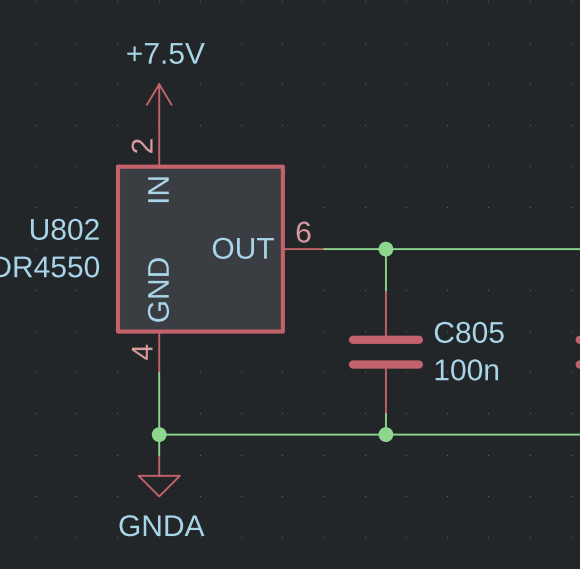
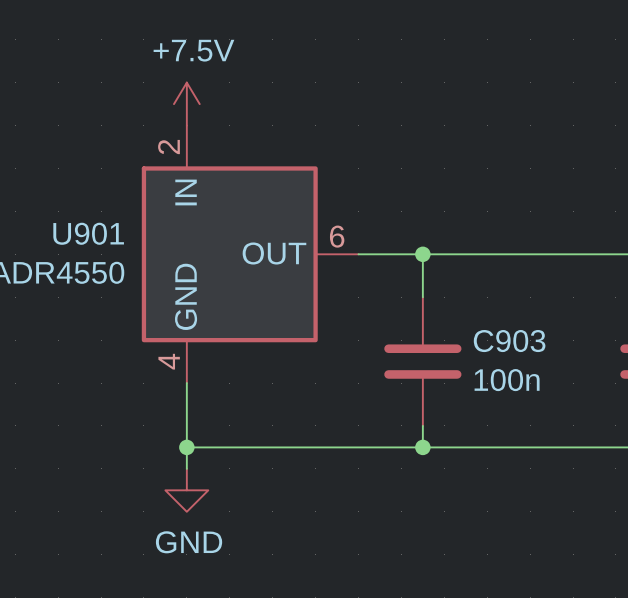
U802 name: U802 (64, 229) -> U901 (88, 233)
C805 name: C805 (469, 332) -> C903 (509, 341)
power symbol: GNDA (159, 475) -> GND (186, 490)

